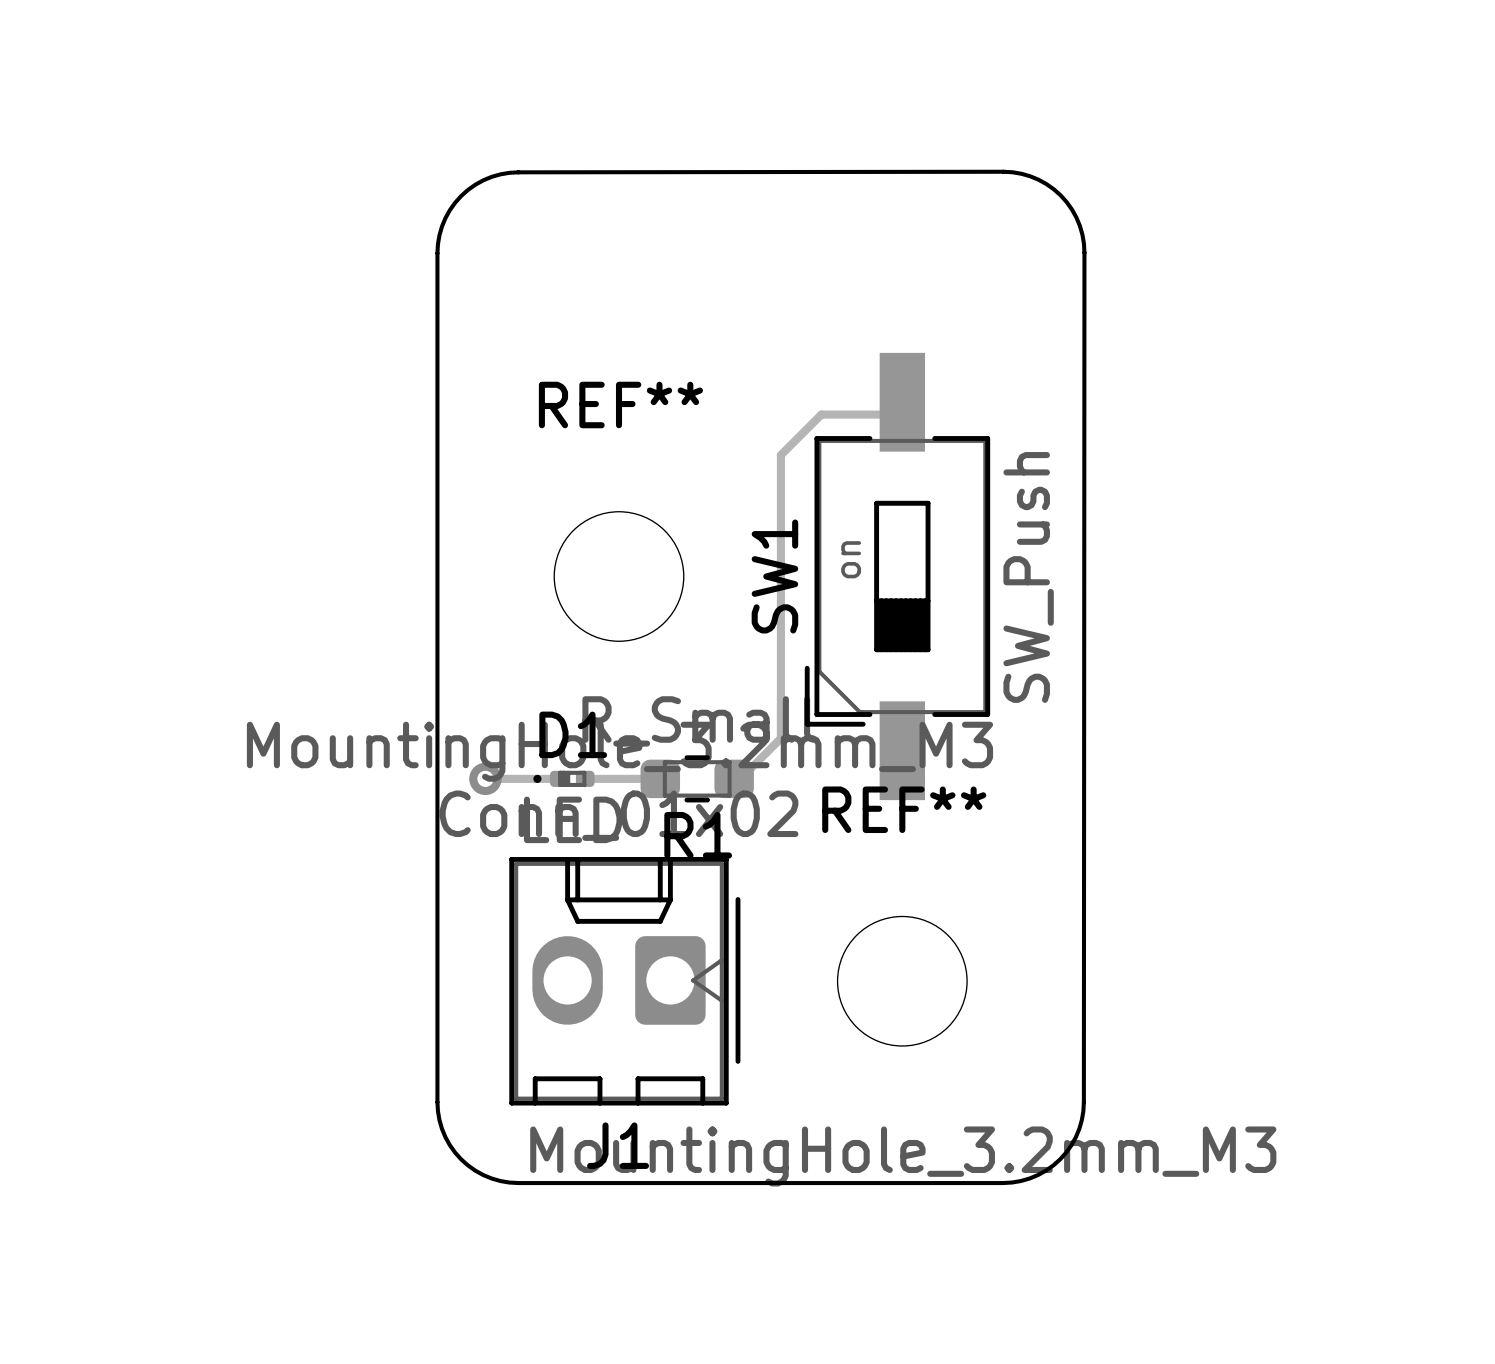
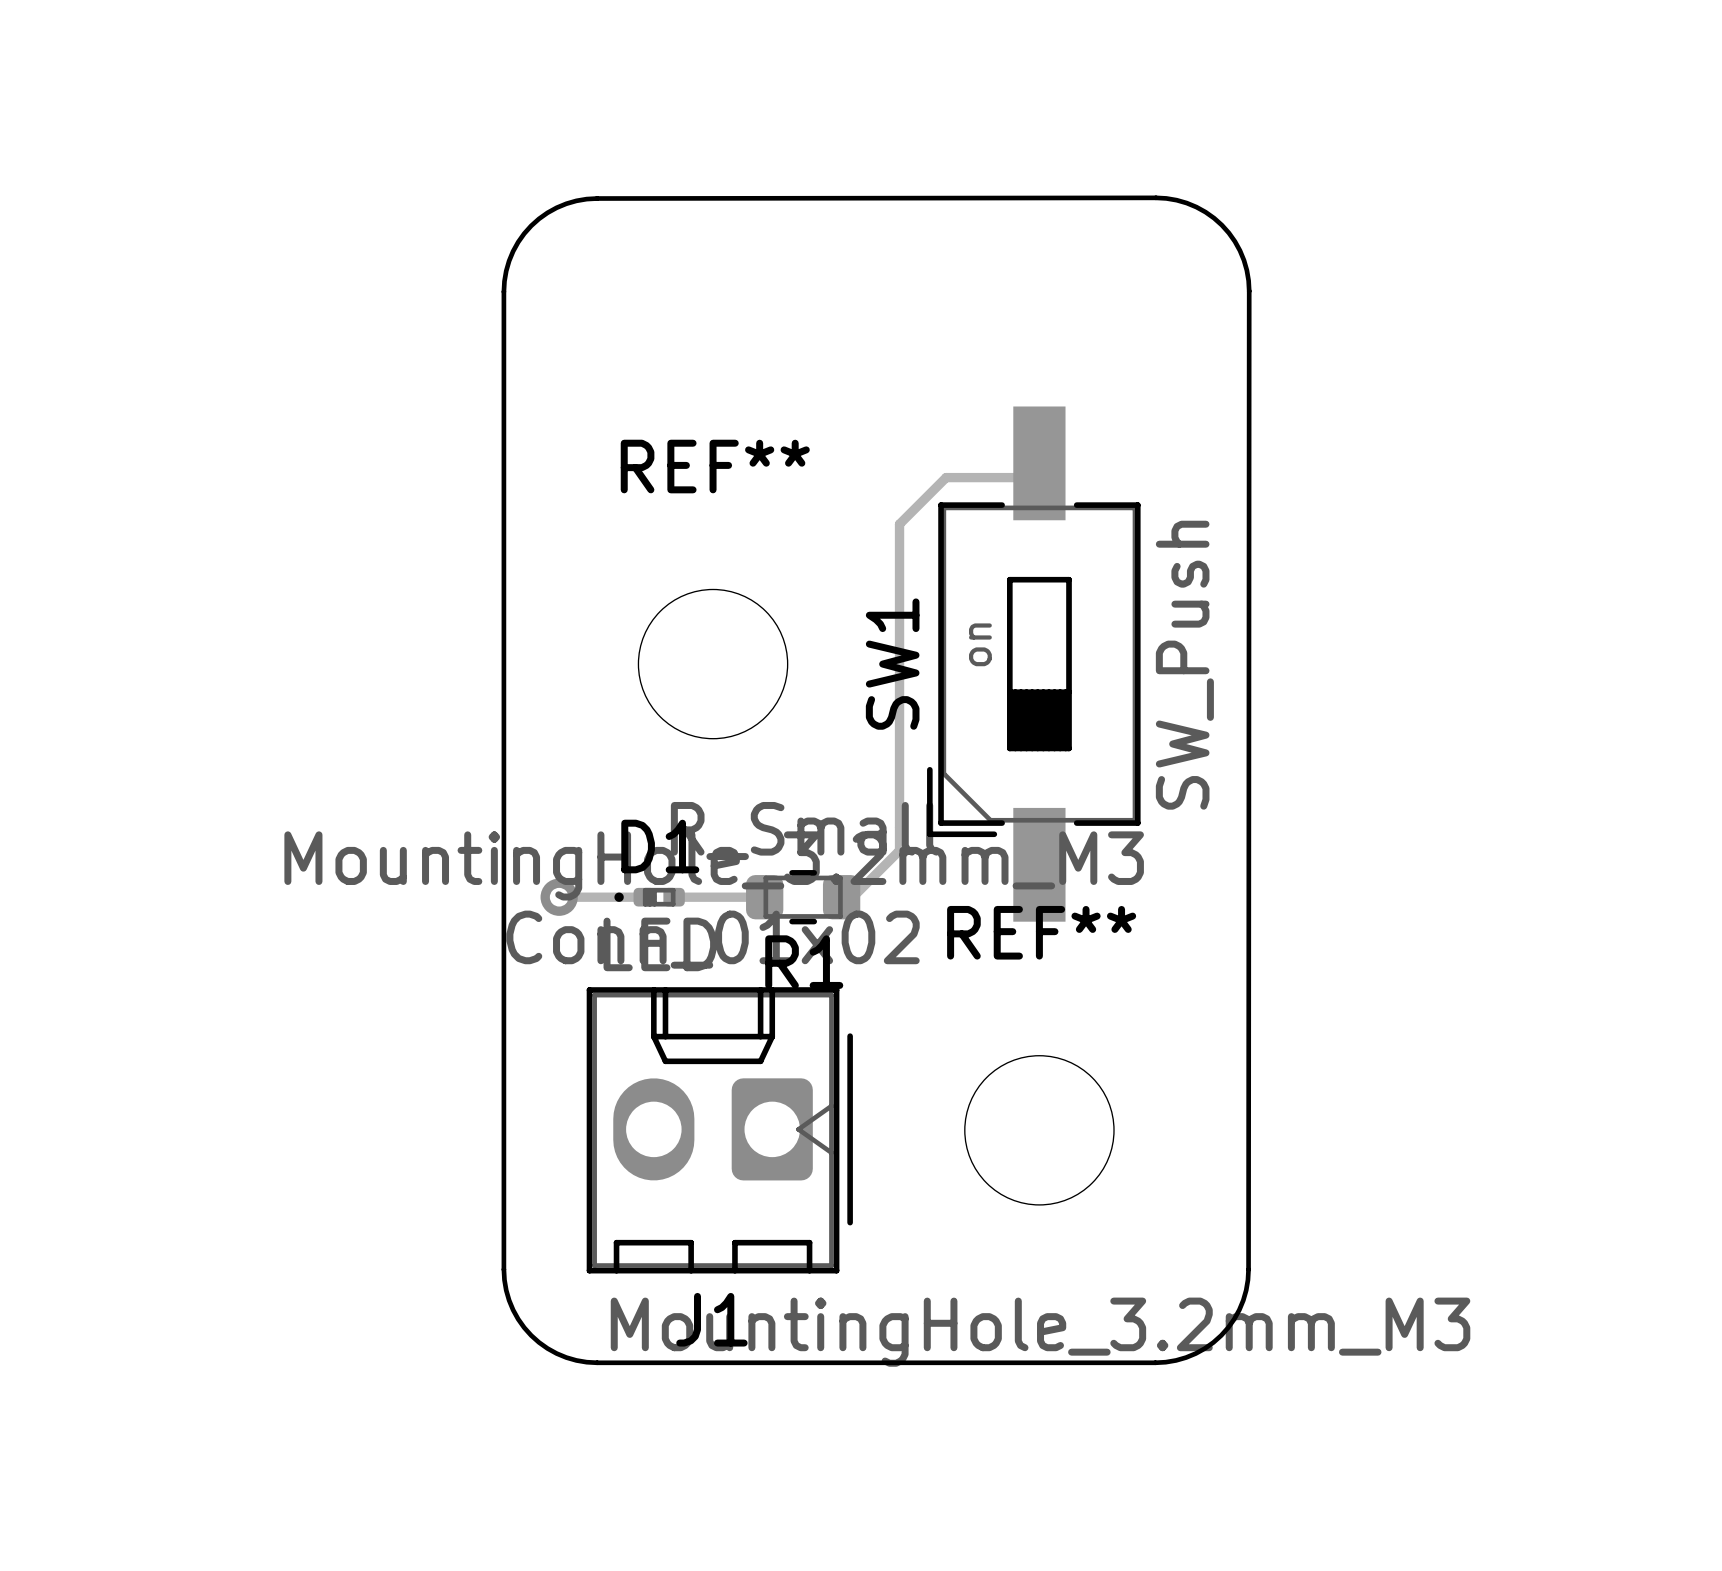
R1 footprint: [640, 755, 754, 803] -> [746, 870, 861, 925]

